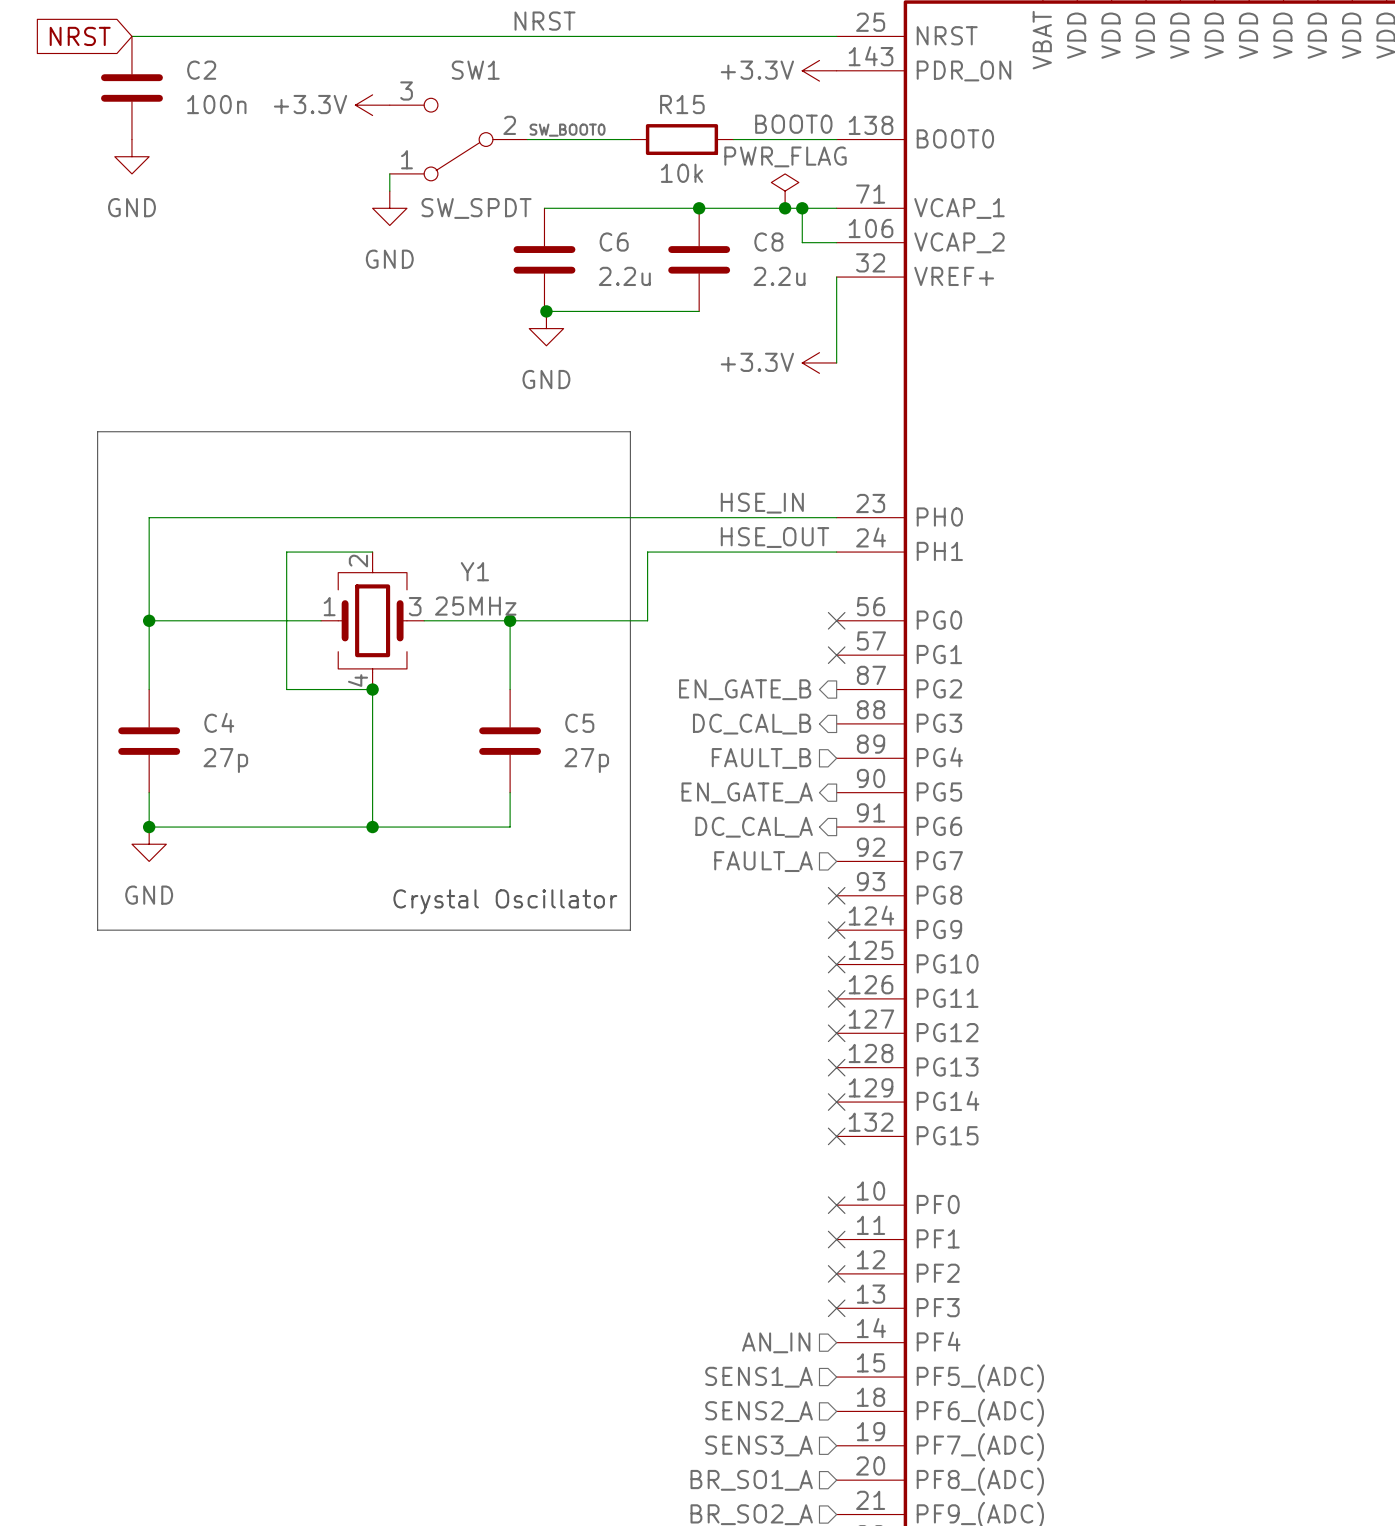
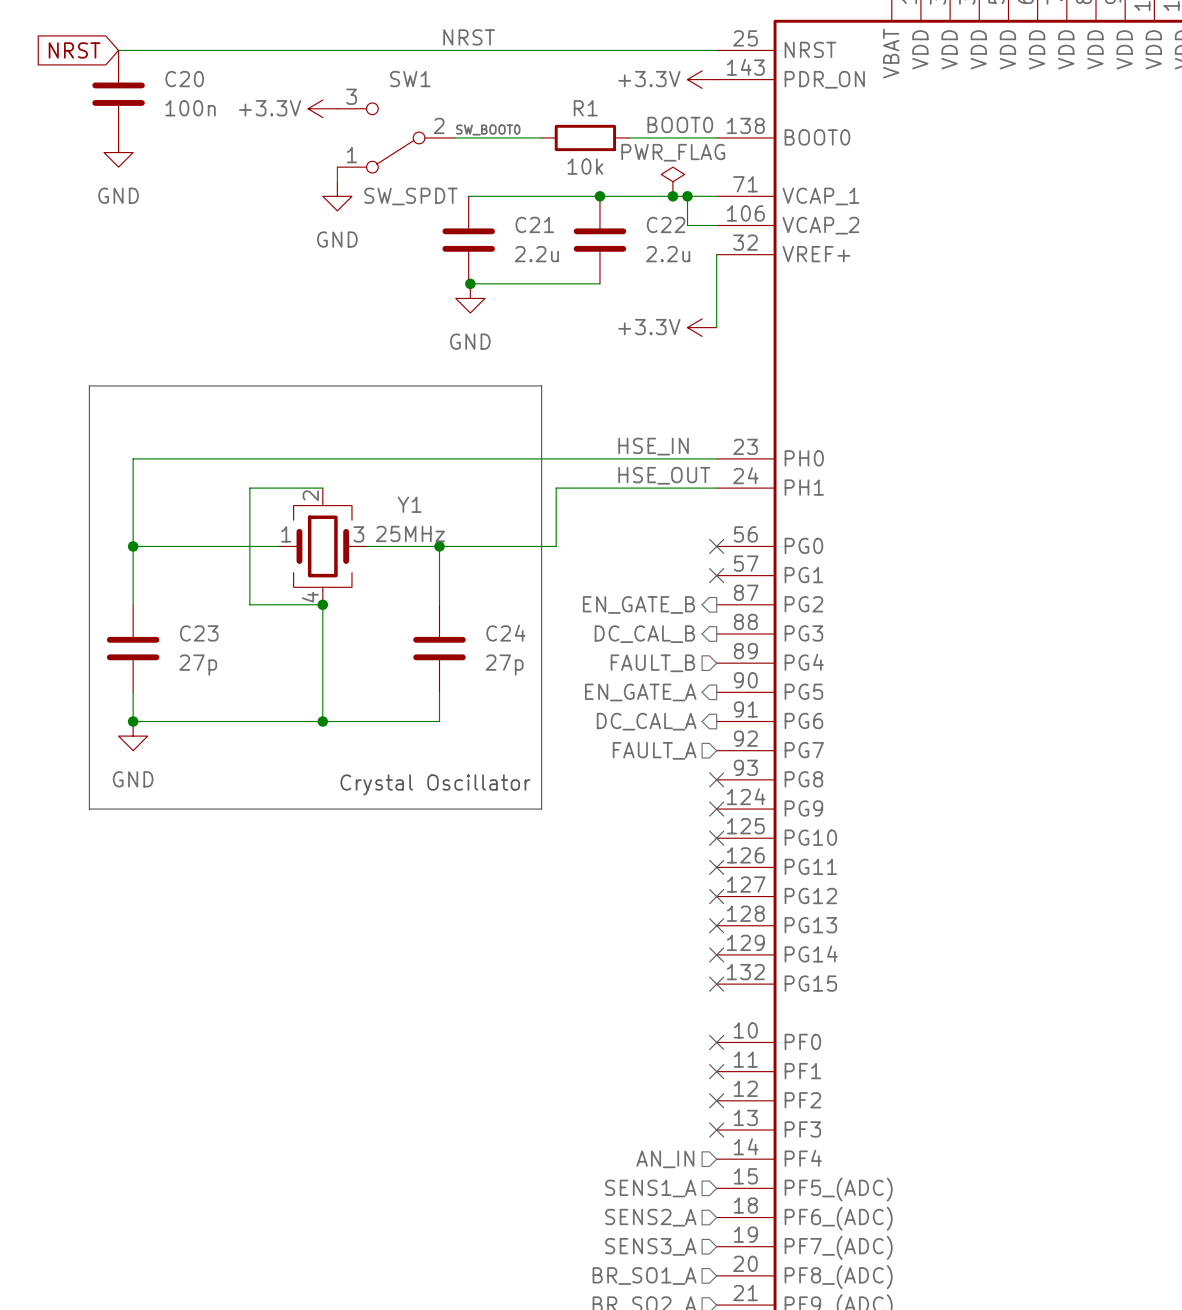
C2 name: C2 (201, 70) -> C20 (184, 79)
R15 name: R15 (682, 104) -> R1 (585, 108)
C6 name: C6 (614, 242) -> C21 (534, 224)
C8 name: C8 (768, 242) -> C22 (666, 224)
C4 name: C4 (219, 722) -> C23 (199, 633)
C5 name: C5 (579, 723) -> C24 (505, 633)

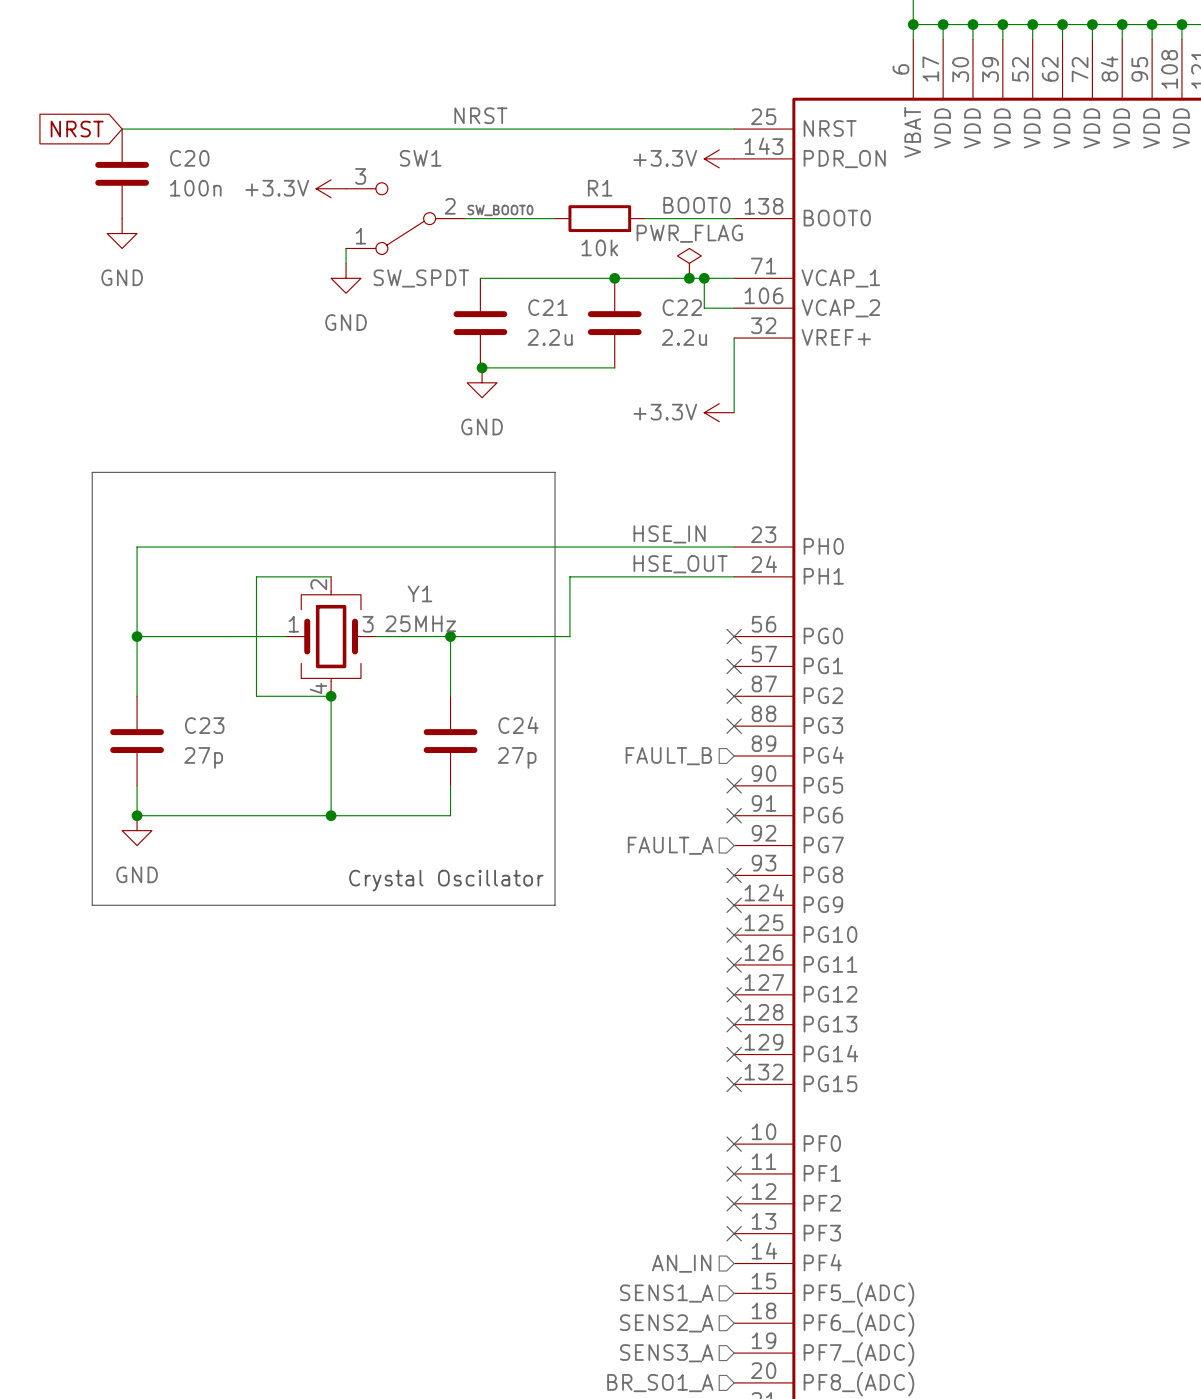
hierarchical label: EN_GATE_B (639, 604) -> none
no-connect mark: none -> (734, 696)
no-connect mark: none -> (734, 726)
hierarchical label: DC_CAL_B (644, 634) -> none
hierarchical label: EN_GATE_A (640, 692) -> none
no-connect mark: none -> (734, 785)
hierarchical label: DC_CAL_A (646, 721) -> none
no-connect mark: none -> (734, 815)

